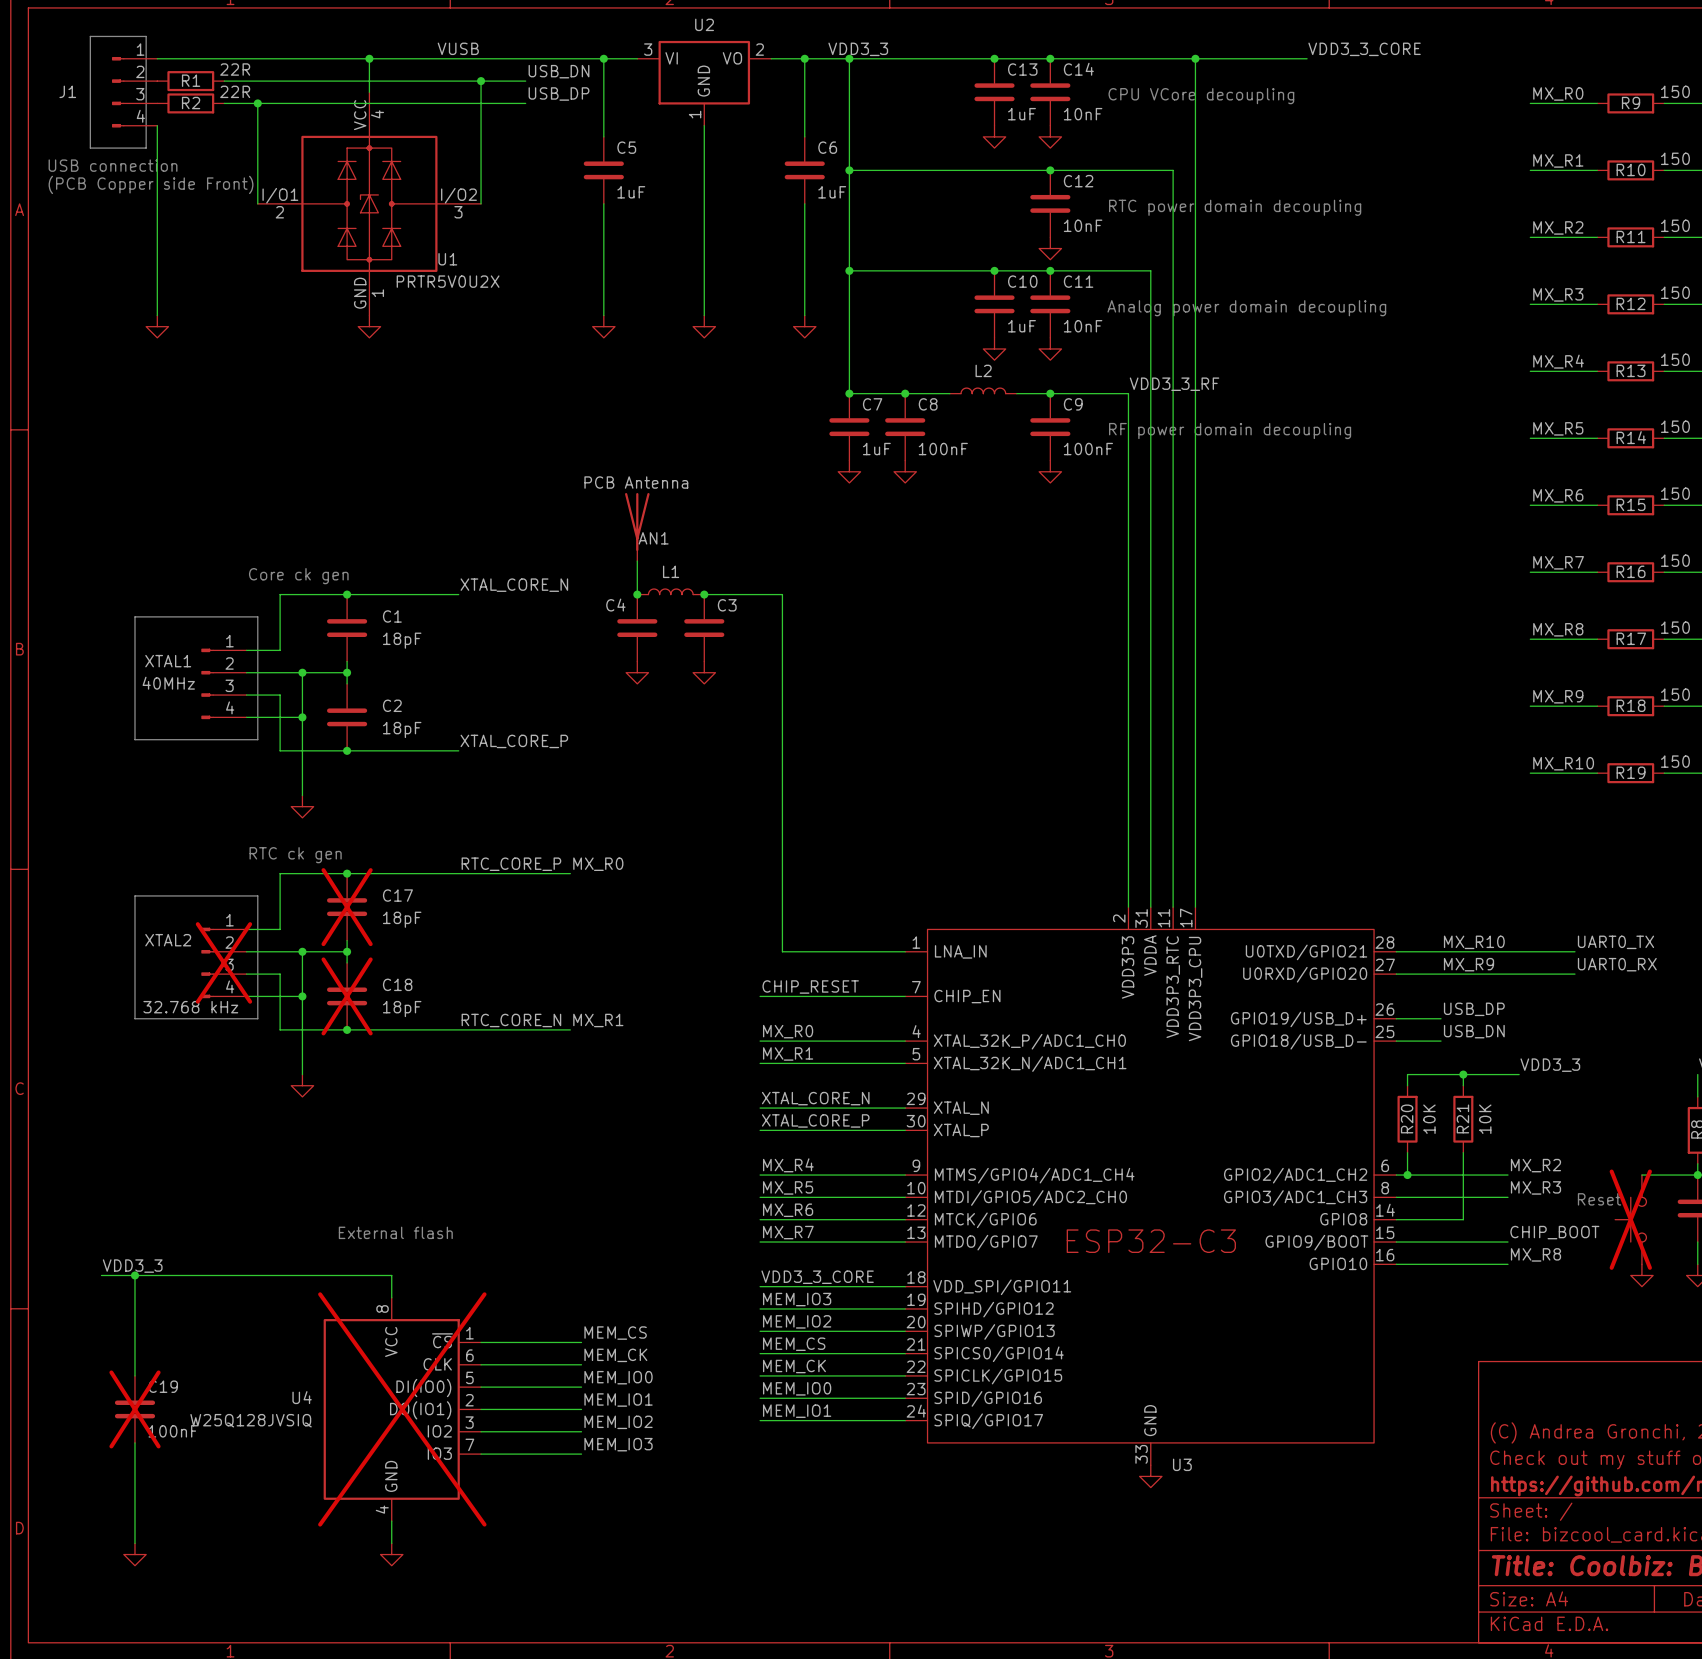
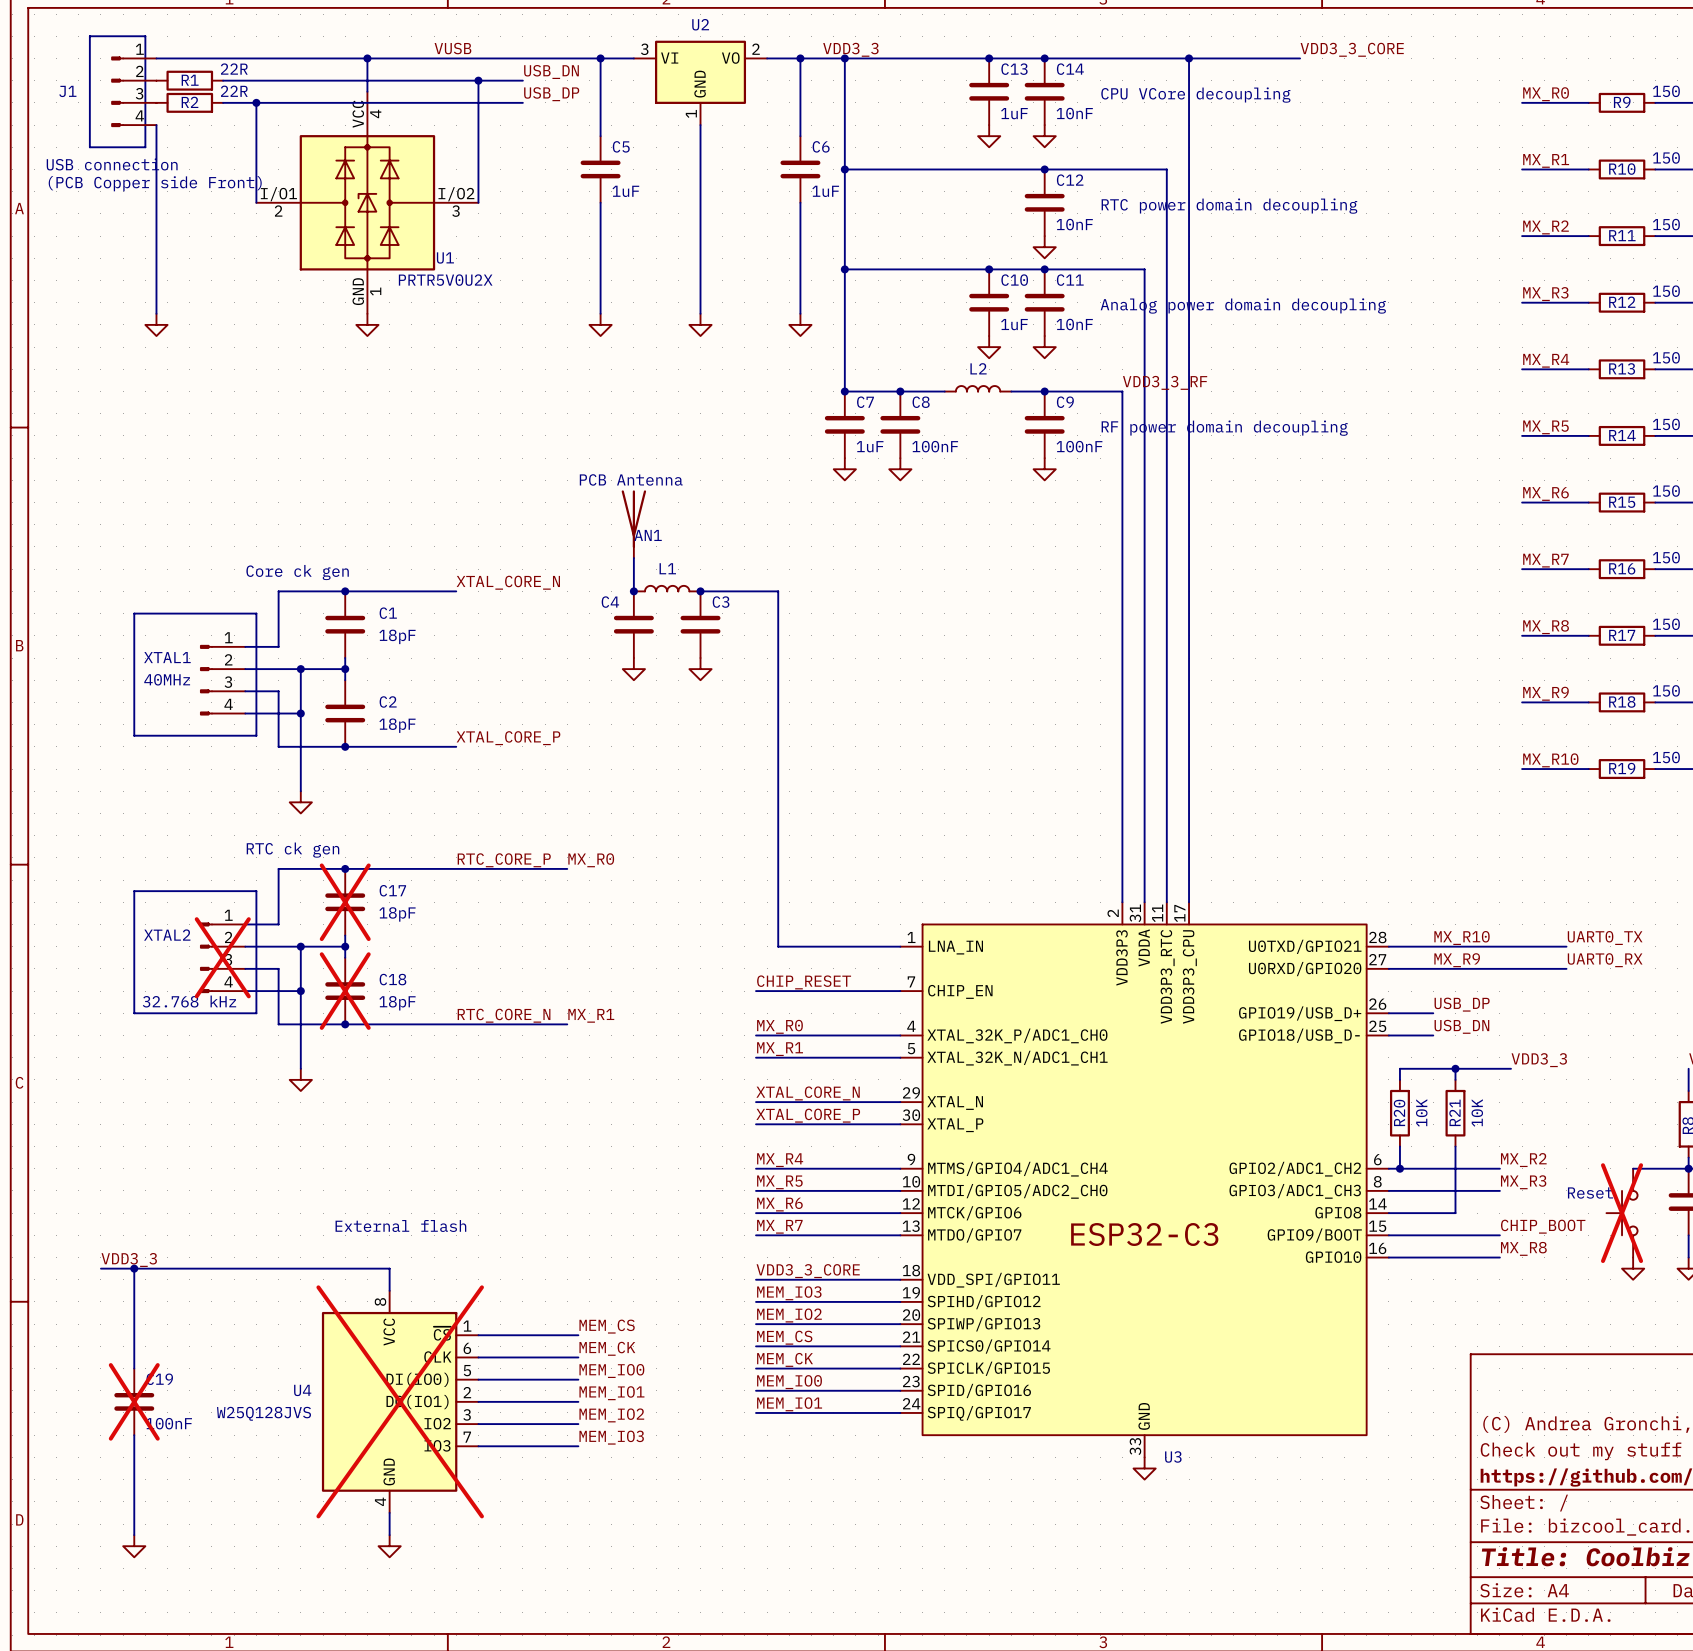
U4 value: W25Q128JVSIQ (251, 1420) -> W25Q128JVS (264, 1413)

